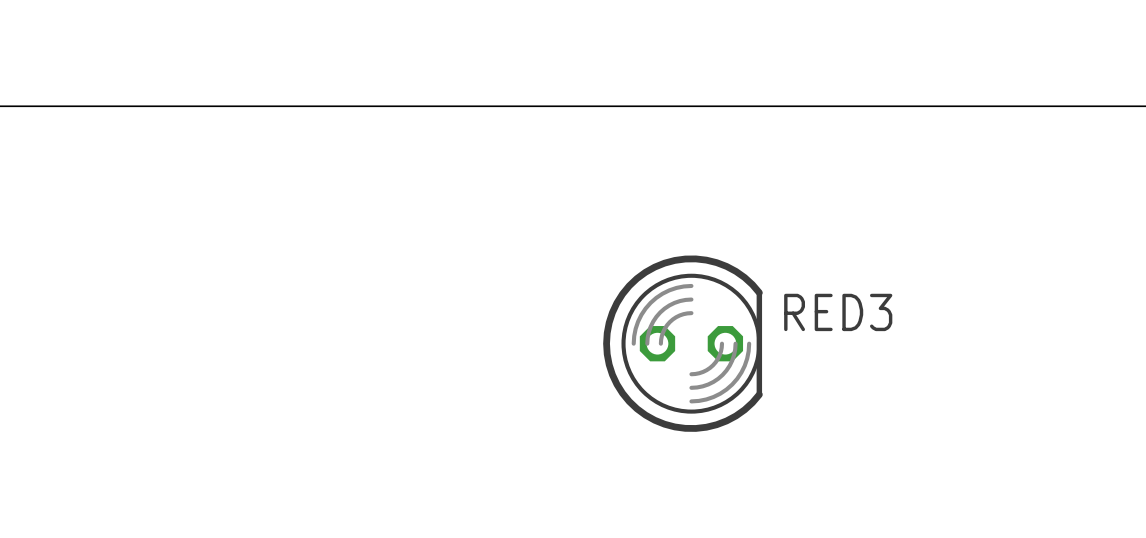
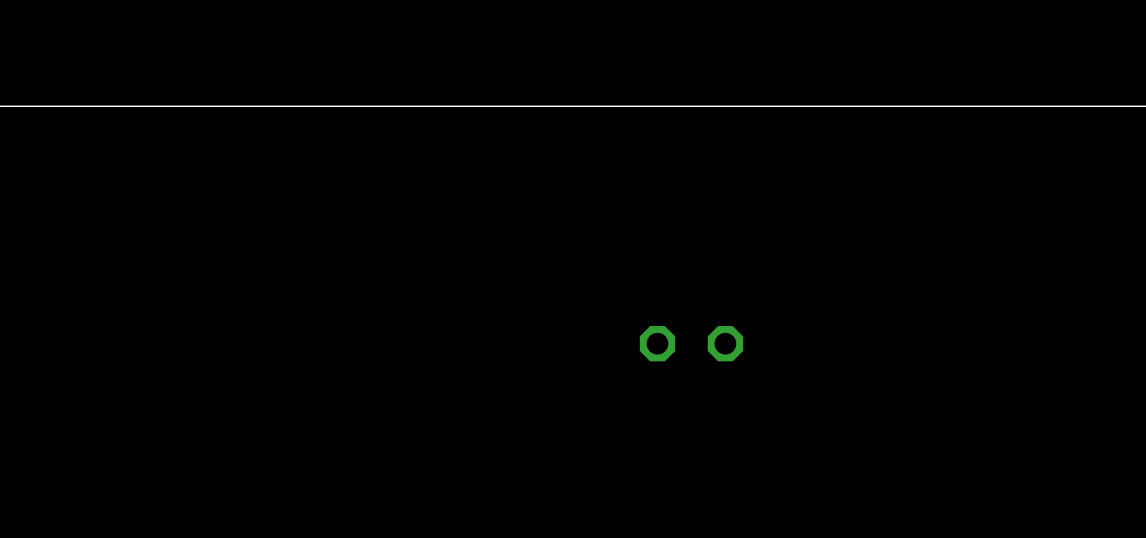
RED3 side: bottom (682, 343) -> top (691, 343)

